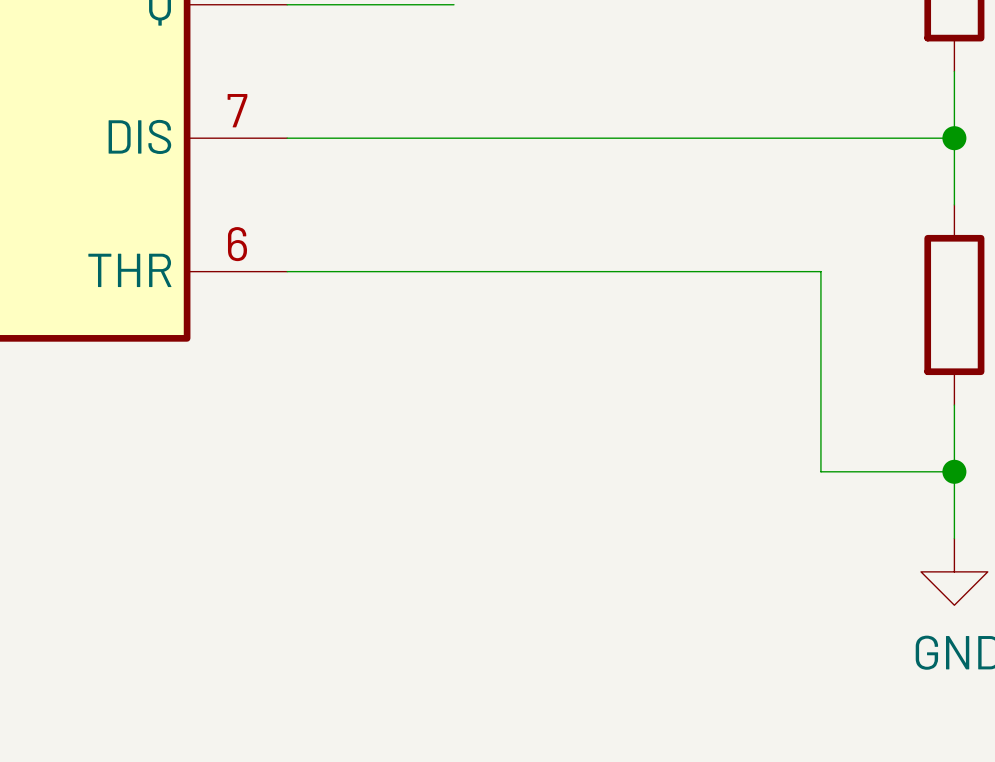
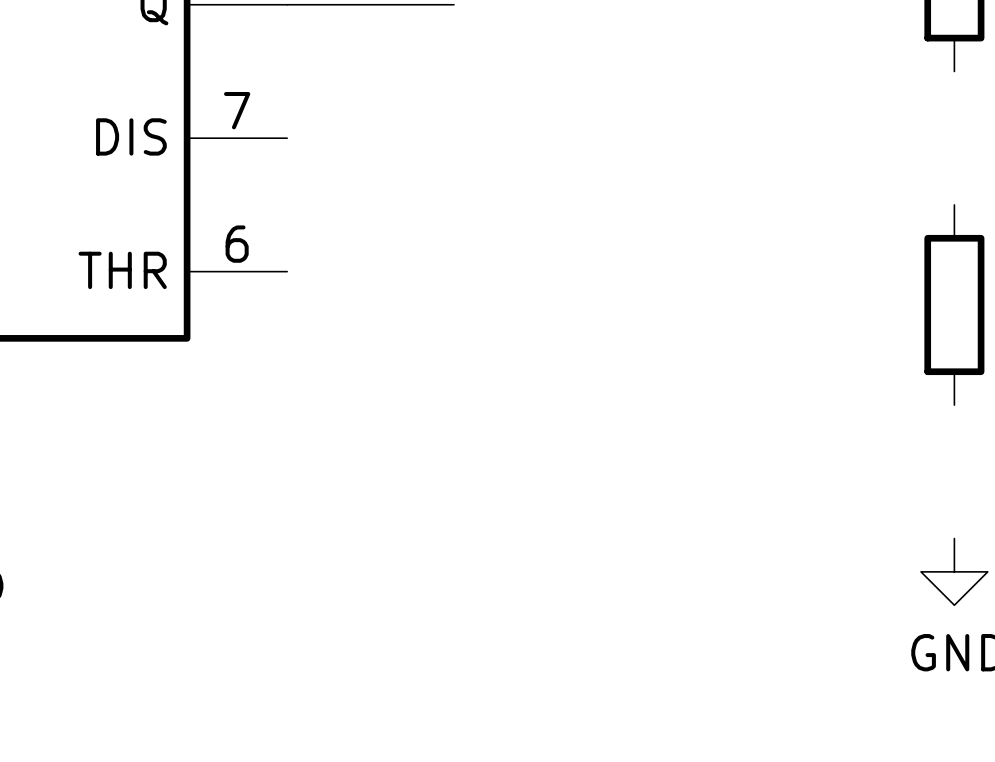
wire: (954, 71) (954, 204) -> none
wire: (287, 138) (954, 138) -> none
junction: (954, 138) -> none
wire: (287, 271) (820, 271) (820, 471) (954, 471) -> none
wire: (954, 405) (954, 538) -> none
junction: (954, 471) -> none

